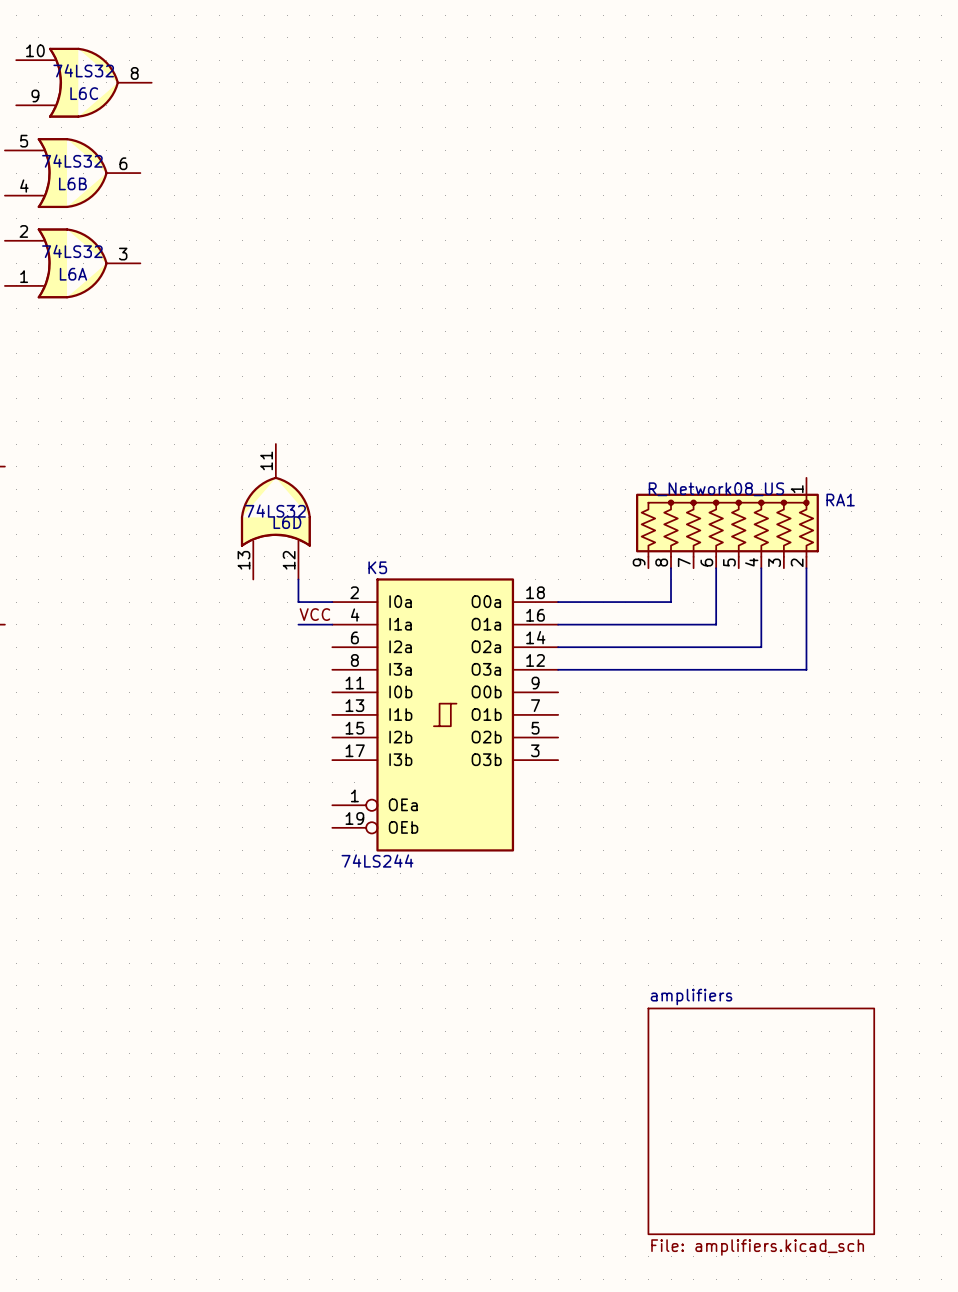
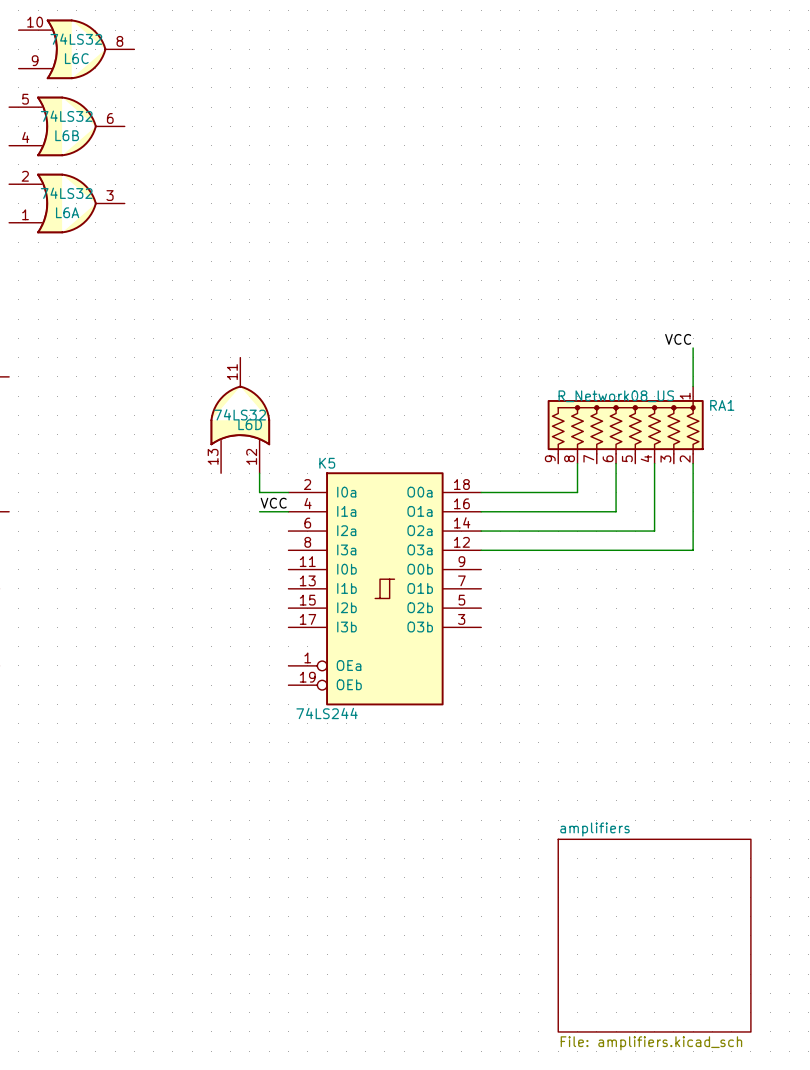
label: none -> VCC (678, 339)
wire: none -> (693, 347) (693, 386)

